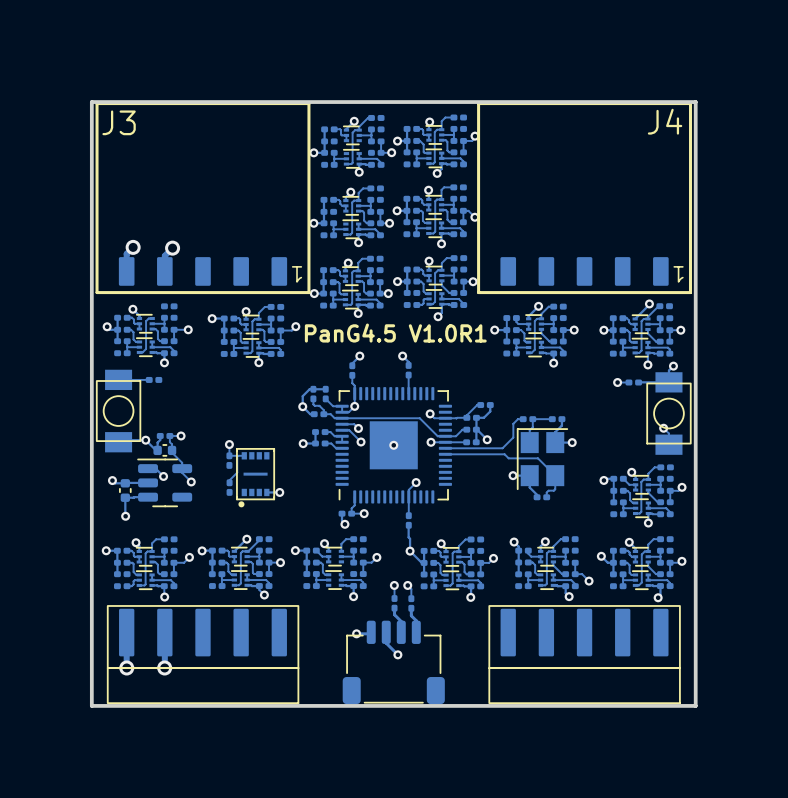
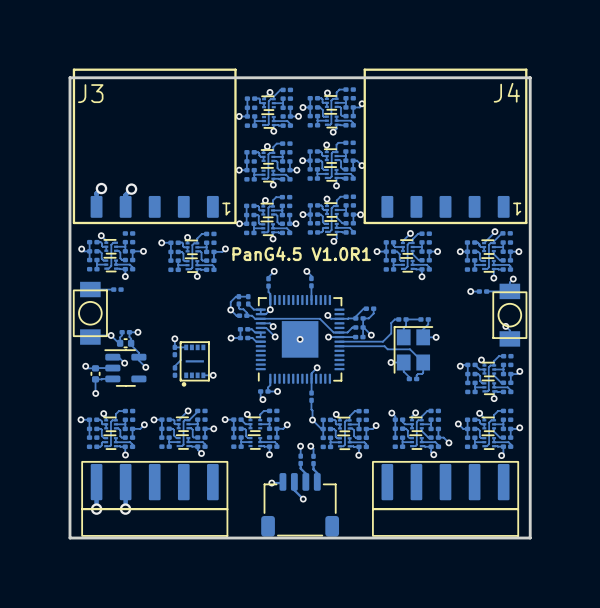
J3 footprint: [95, 102, 311, 295] -> [72, 68, 237, 225]
J4 footprint: [477, 102, 693, 295] -> [363, 68, 528, 225]

